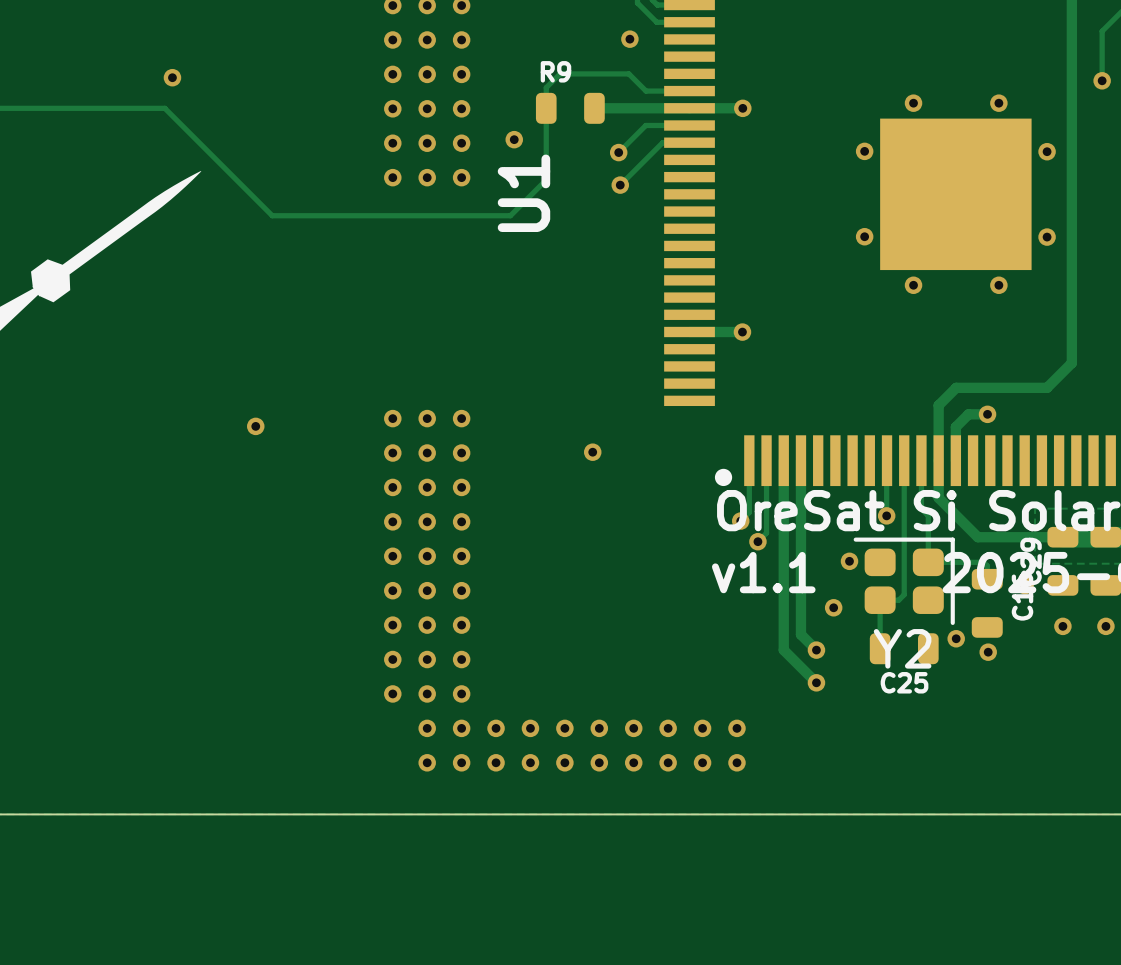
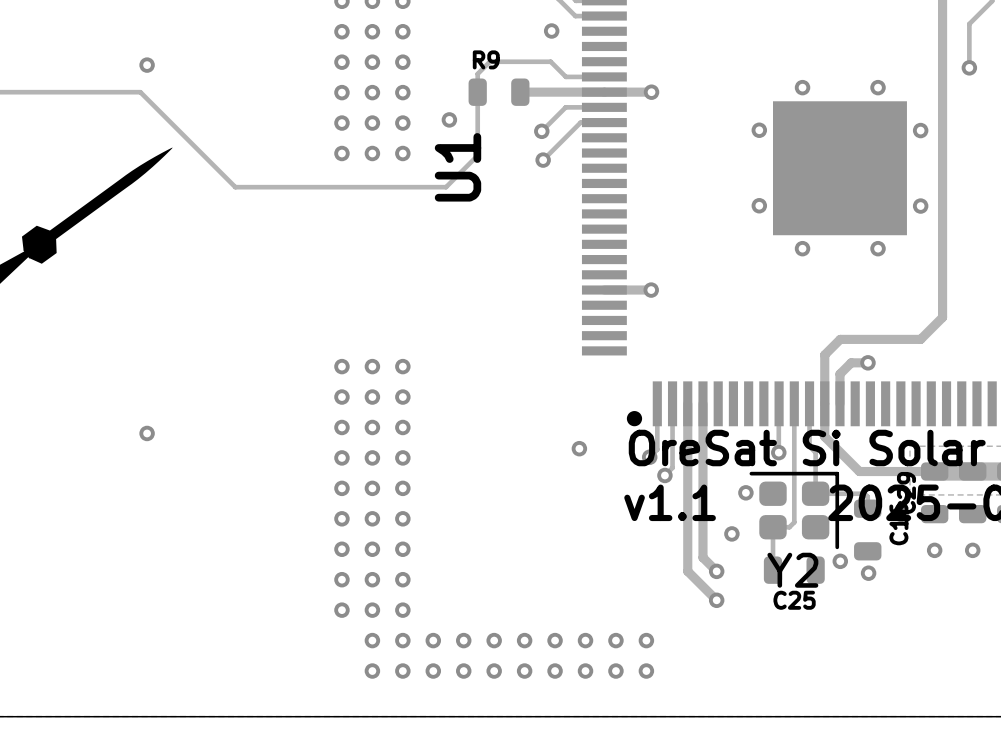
via position: (255, 426) -> (147, 433)
via position: (592, 452) -> (579, 448)

